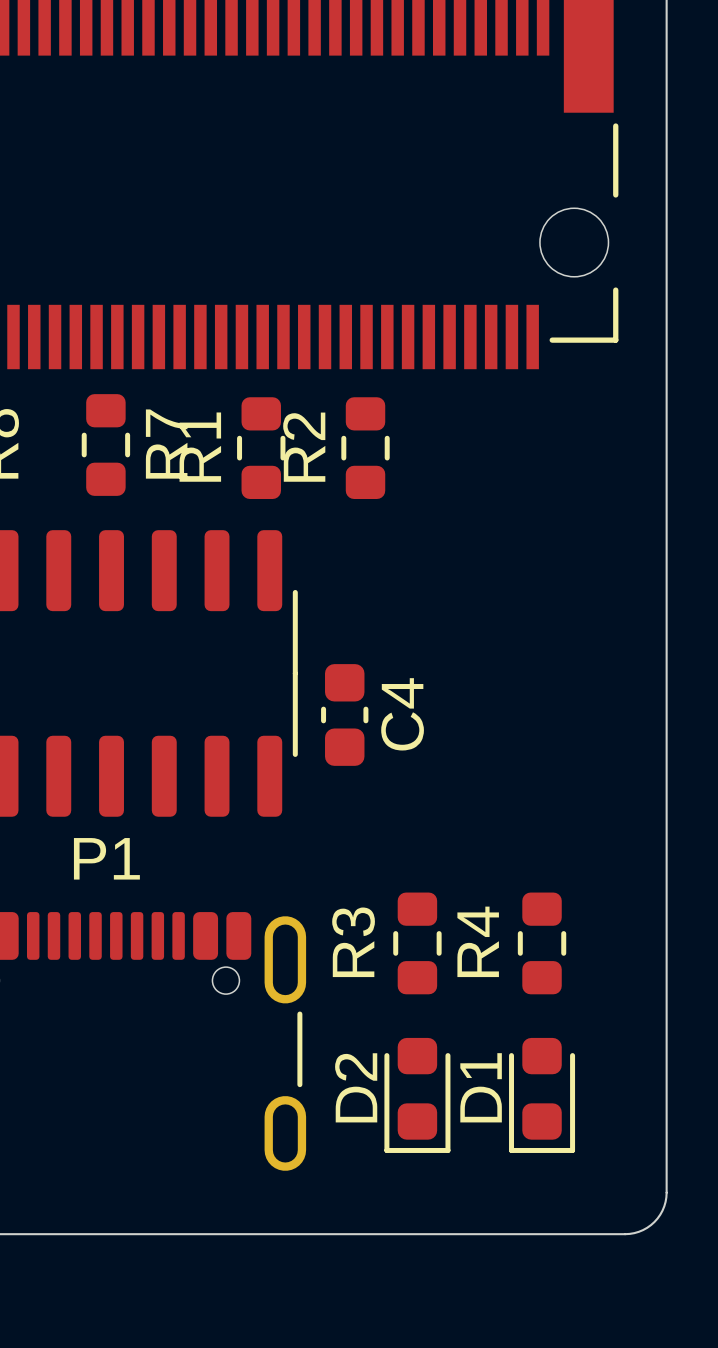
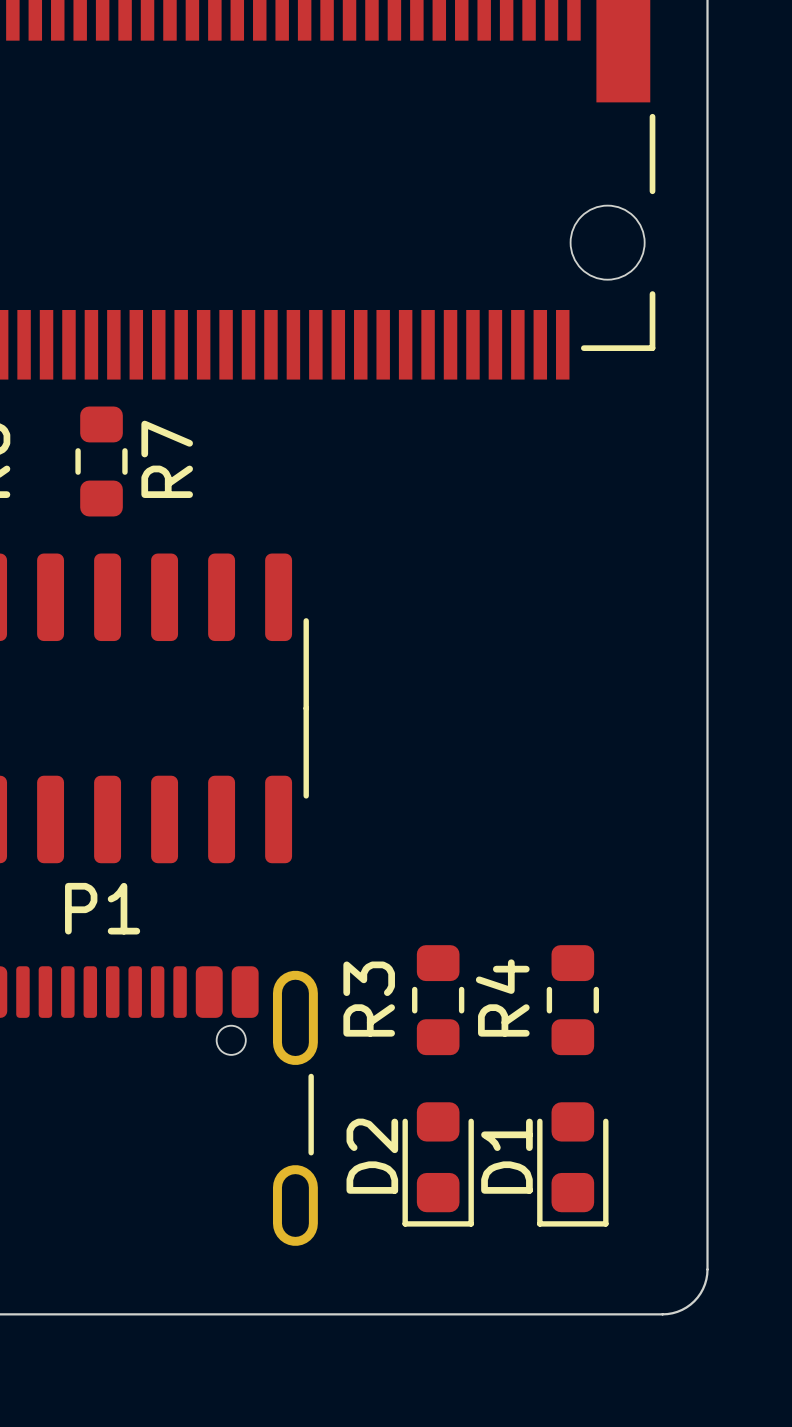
R1: (261, 448) -> none
R2: (365, 448) -> none
C4: (344, 714) -> none

